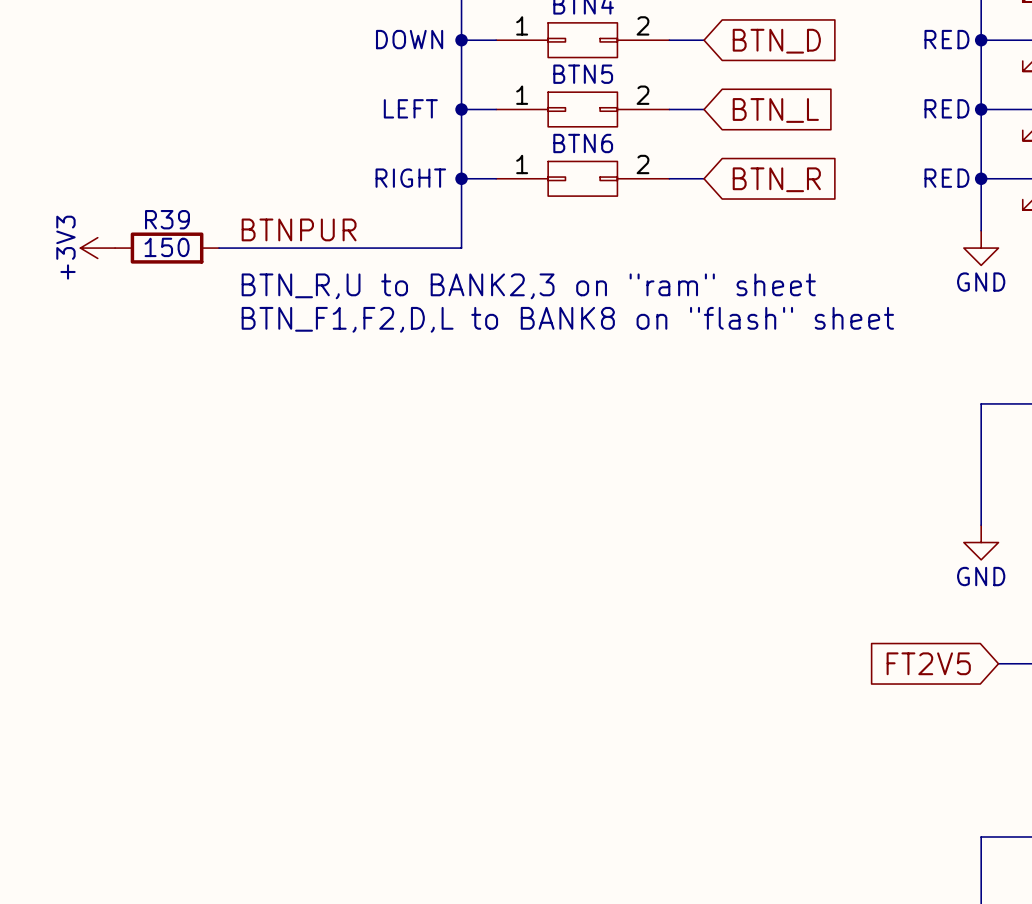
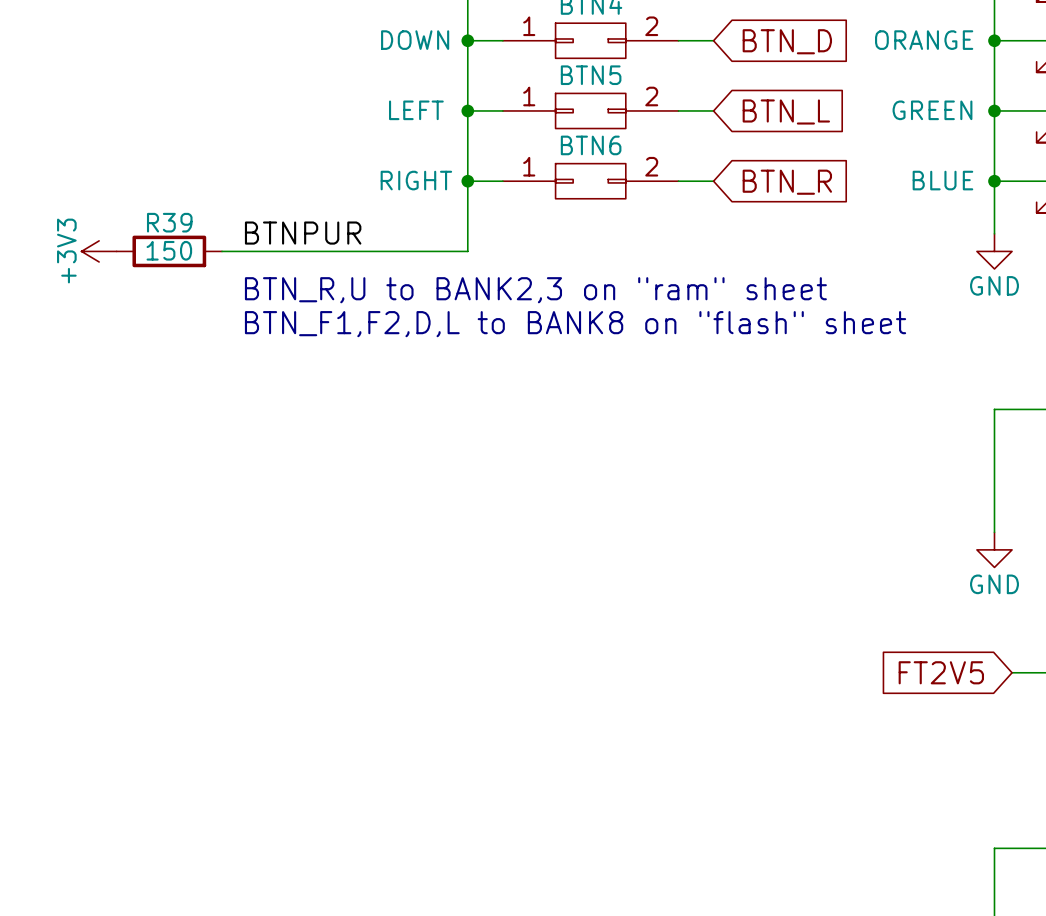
part value: RED (946, 39) -> ORANGE (924, 40)
part value: RED (946, 108) -> GREEN (932, 110)
part value: RED (946, 178) -> BLUE (942, 180)

